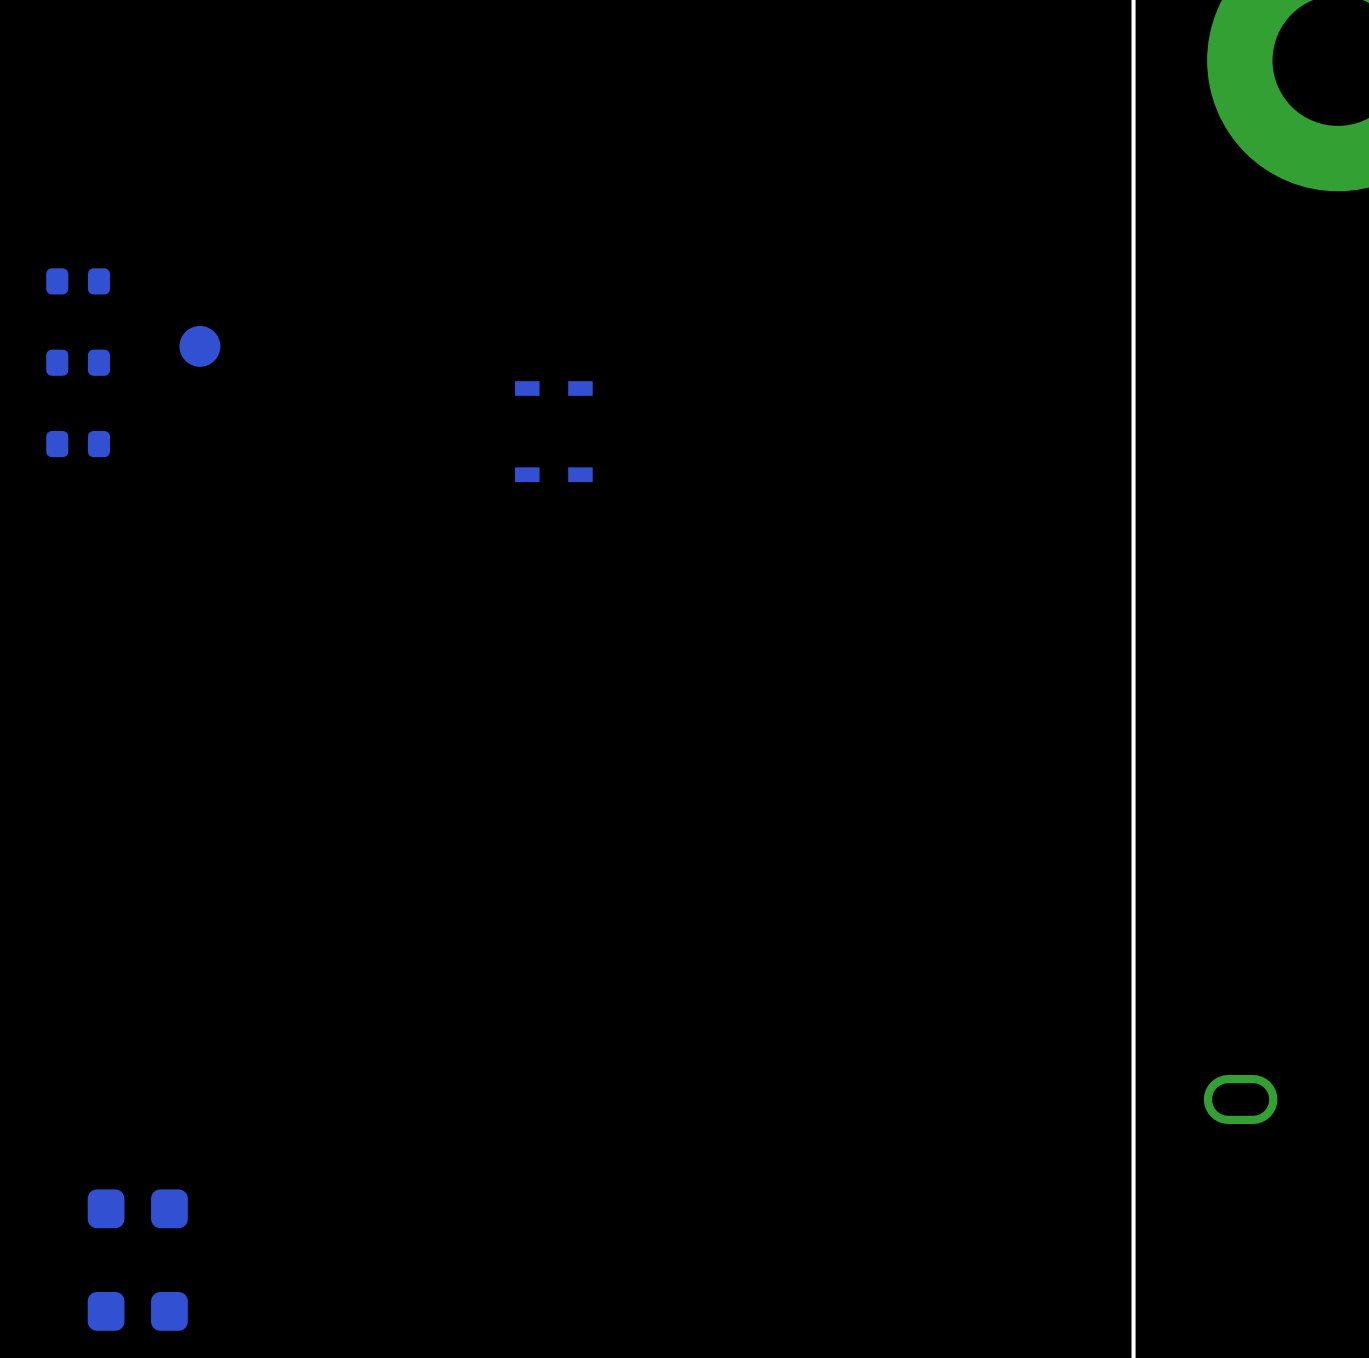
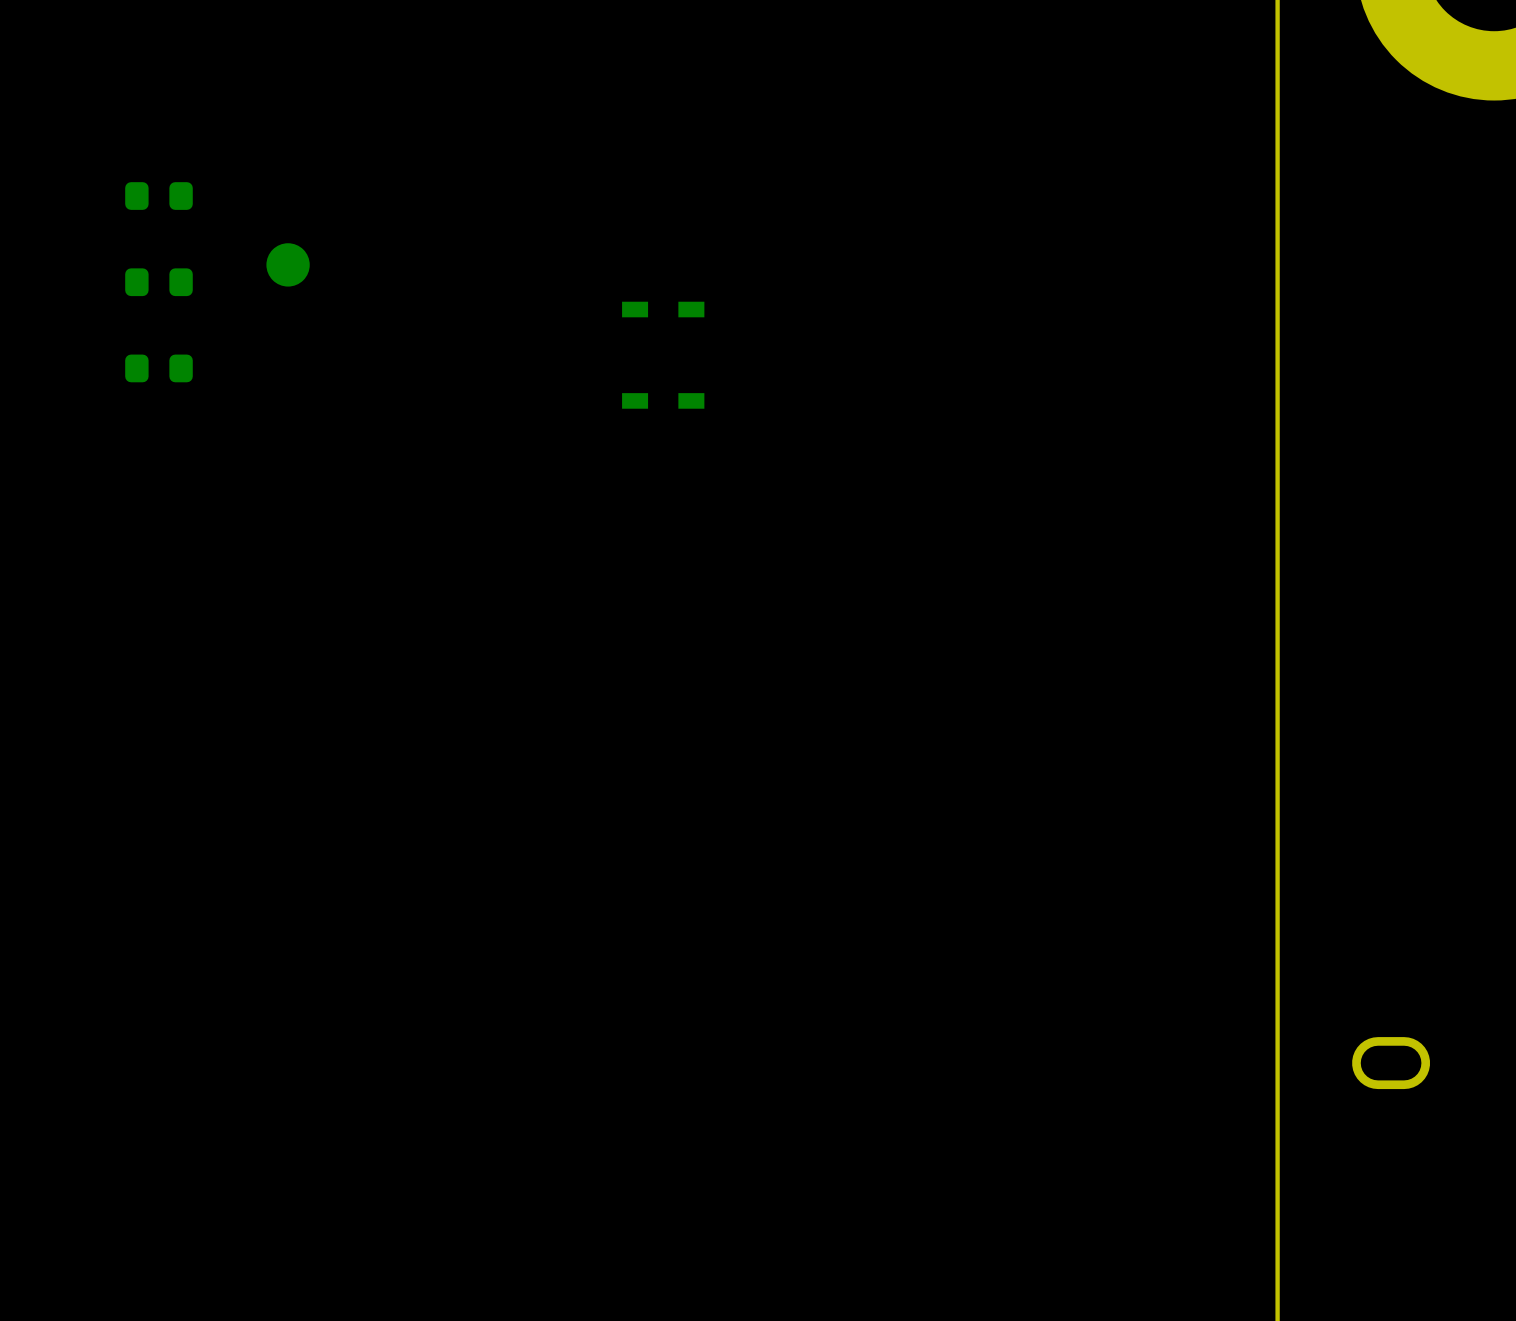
part: (137, 1208) -> none
part: (137, 1311) -> none

